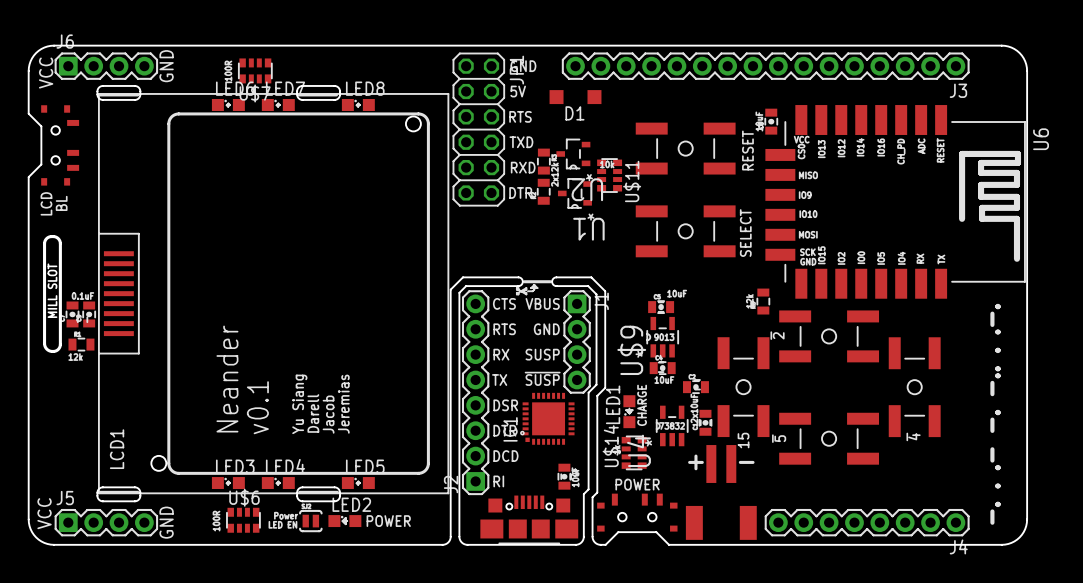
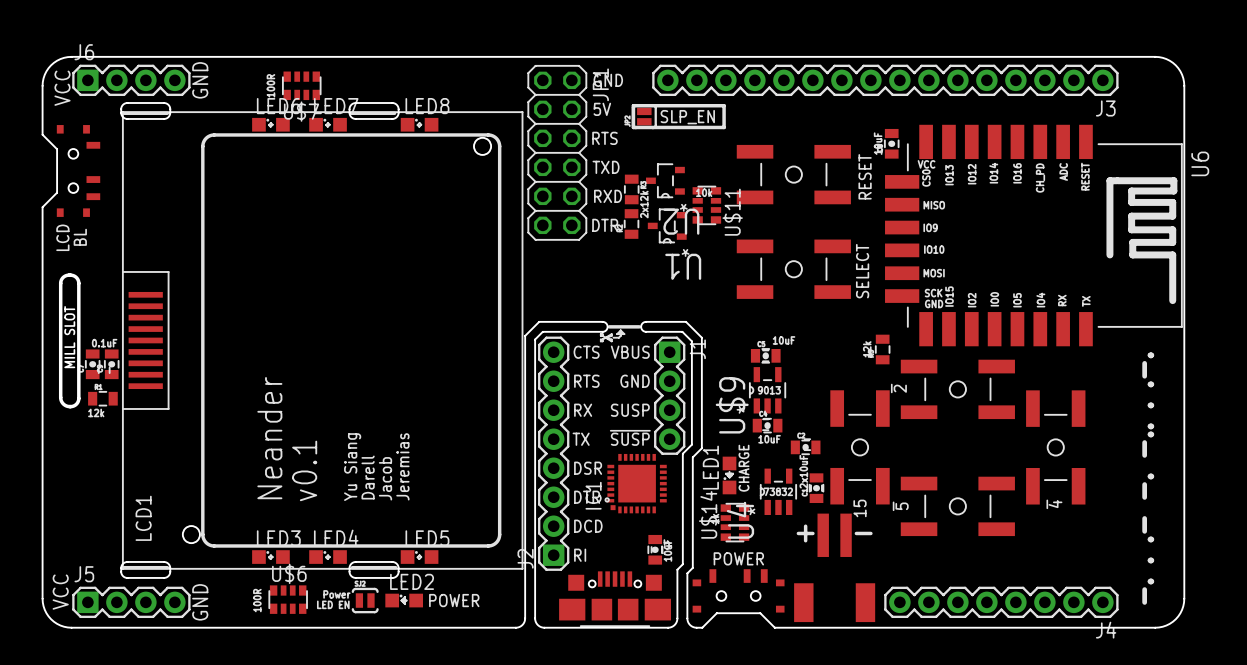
line: none -> (633, 105) (724, 105) (724, 127) (633, 127) (633, 105)
part: none -> (644, 116)
D1: (575, 97) -> none
text: none -> SLP_EN (687, 117)

